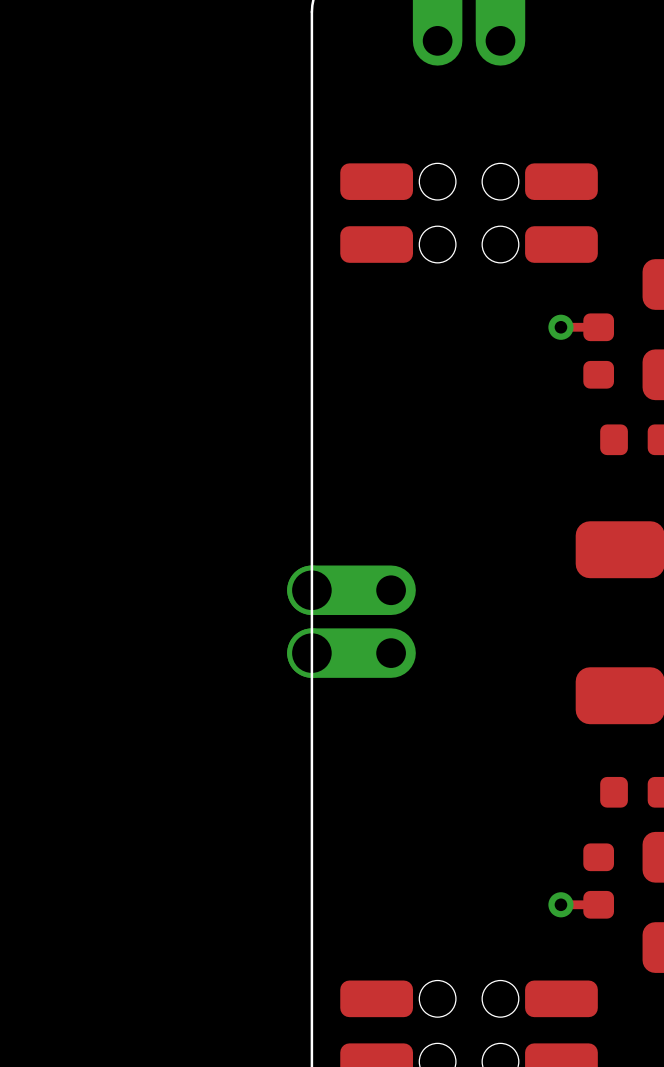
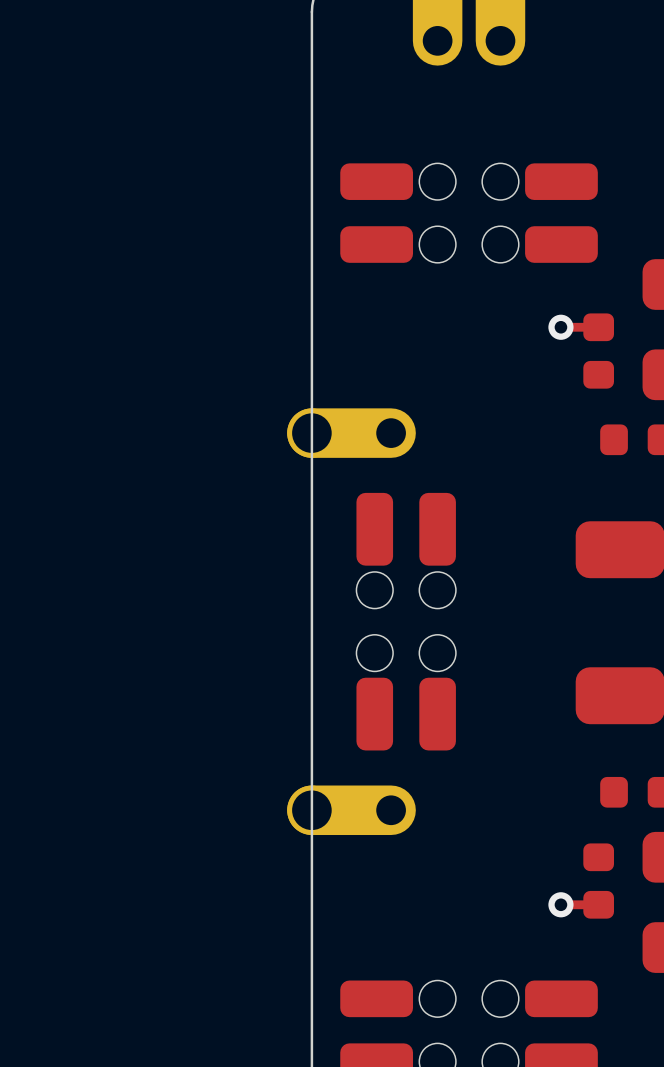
part: none -> (351, 433)
part: (351, 590) -> none
part: none -> (406, 621)
part: (351, 653) -> none
part: none -> (351, 810)

